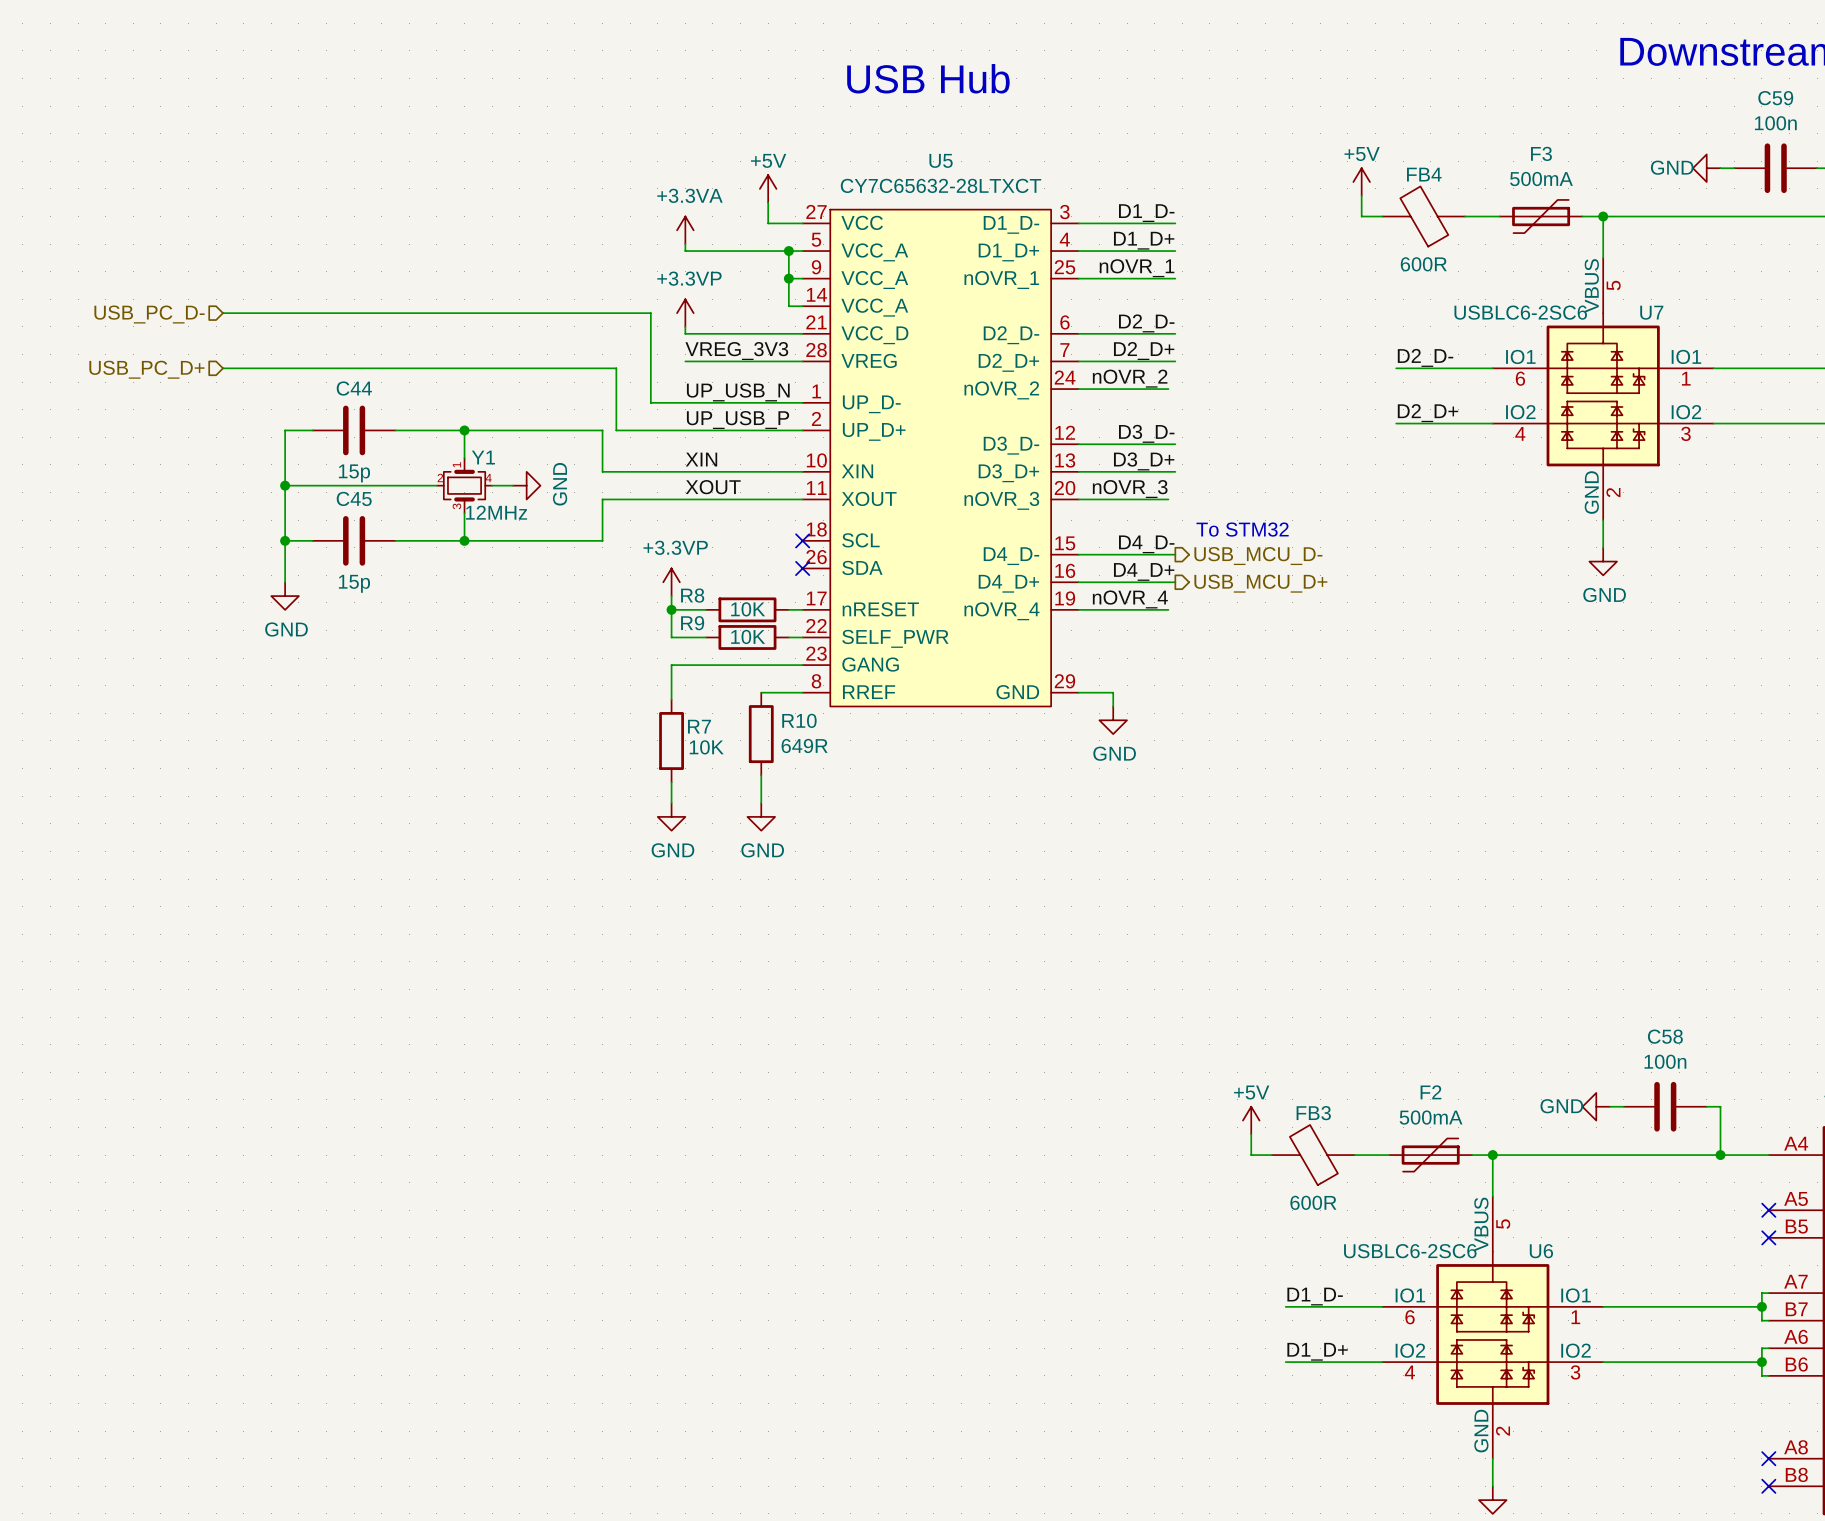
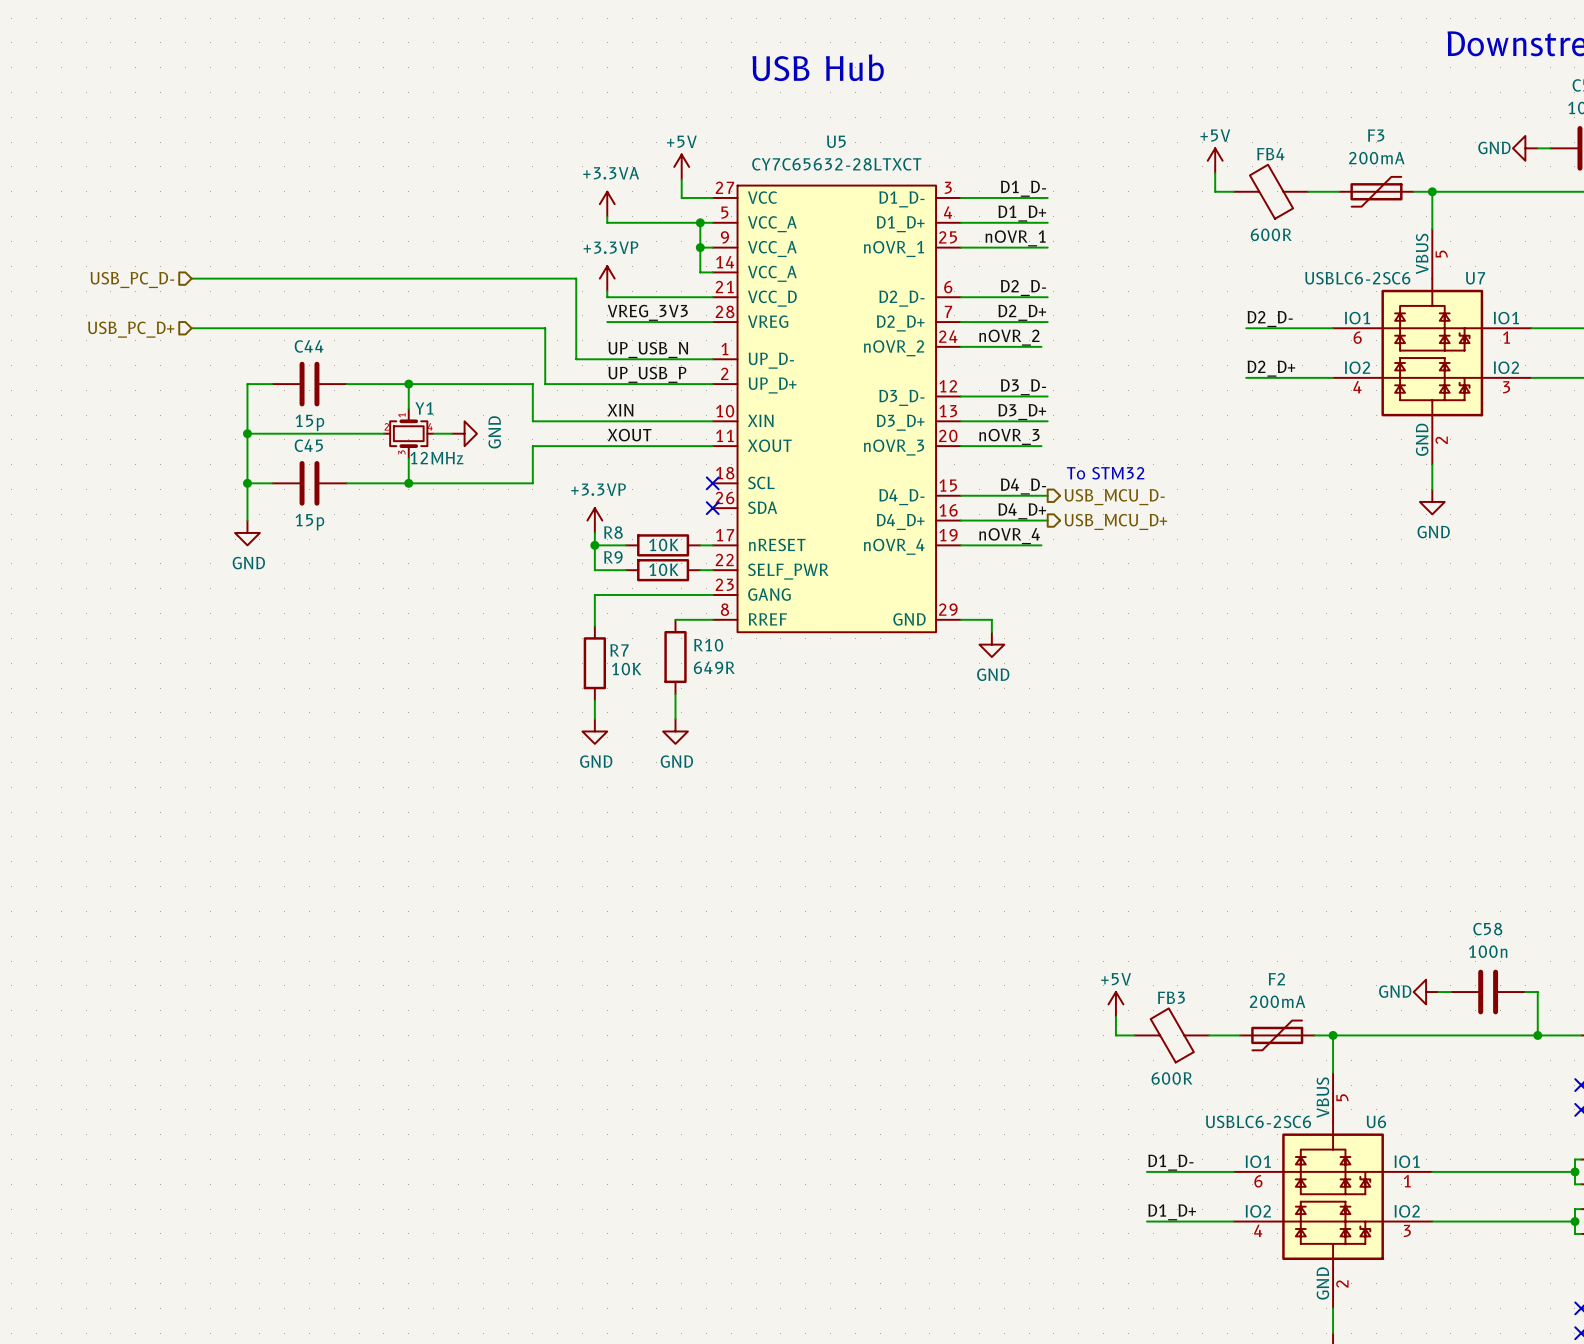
F3 value: 500mA (1541, 179) -> 200mA (1376, 158)
F2 value: 500mA (1431, 1117) -> 200mA (1277, 1001)

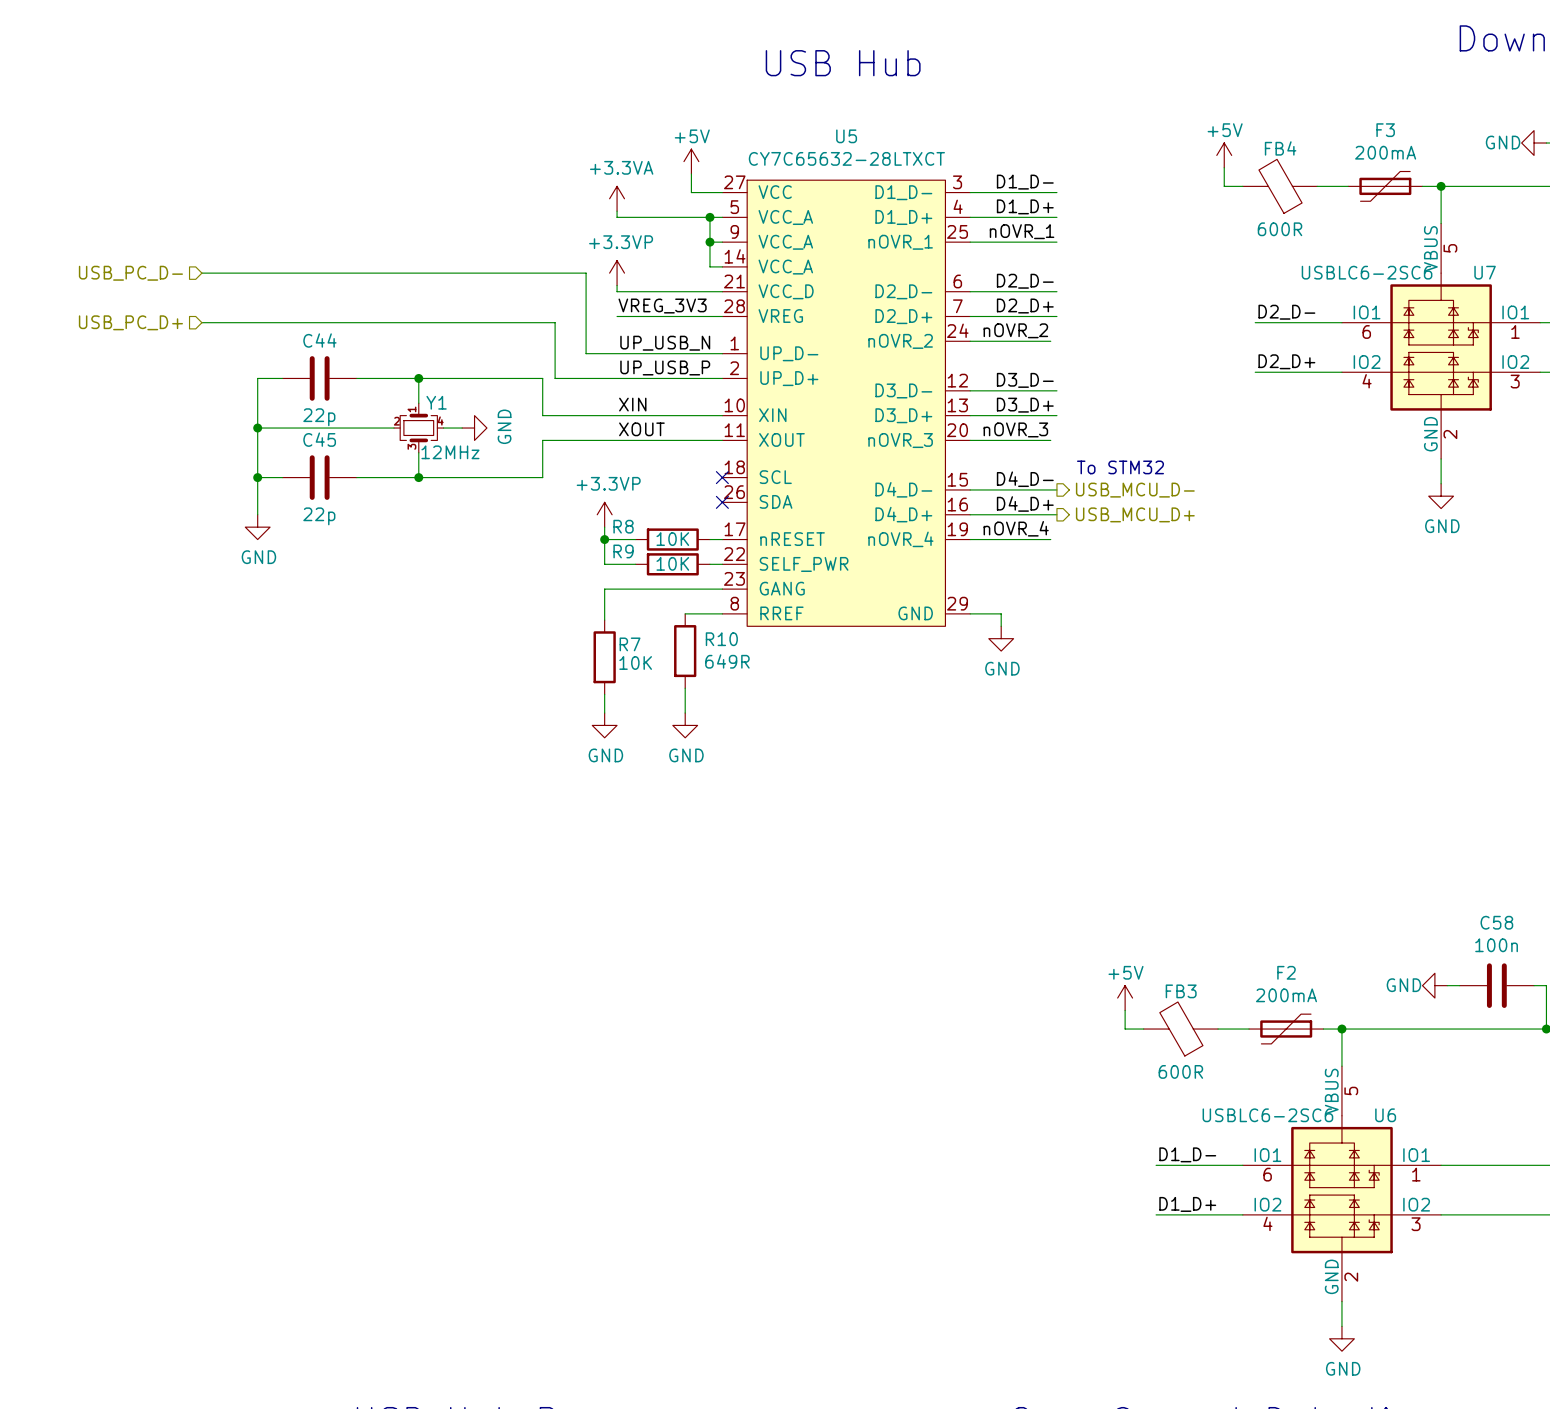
C44 value: 15p (309, 422) -> 22p (319, 417)
C45 value: 15p (309, 522) -> 22p (319, 516)

